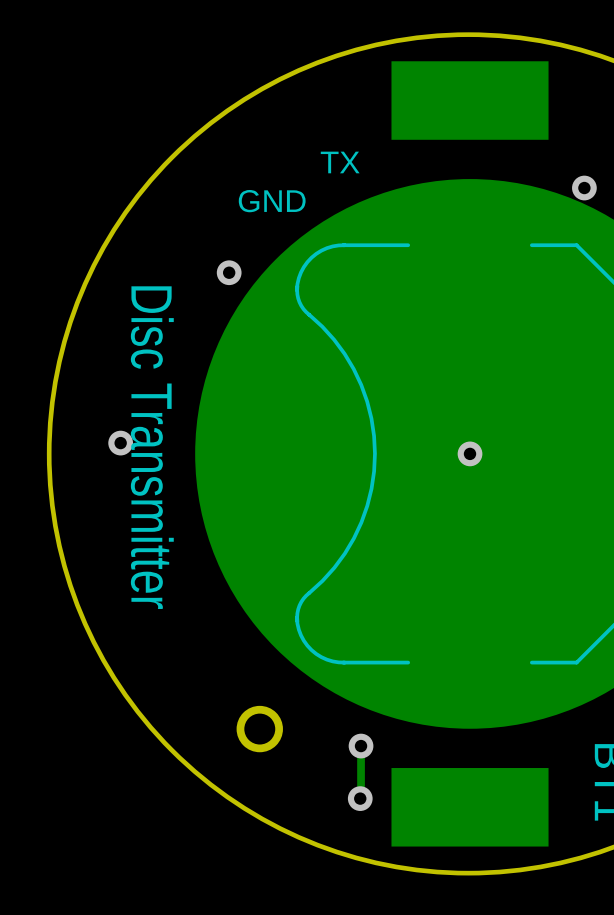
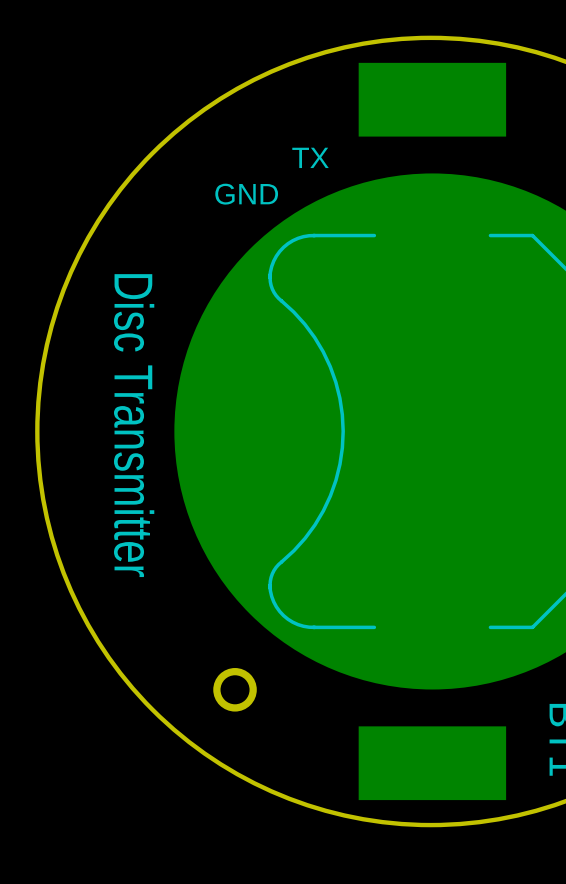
via: (584, 188) -> none
via: (229, 272) -> none
via: (120, 443) -> none
via: (470, 453) -> none
track: (361, 746) (360, 798) -> none
via: (361, 746) -> none
via: (360, 798) -> none

